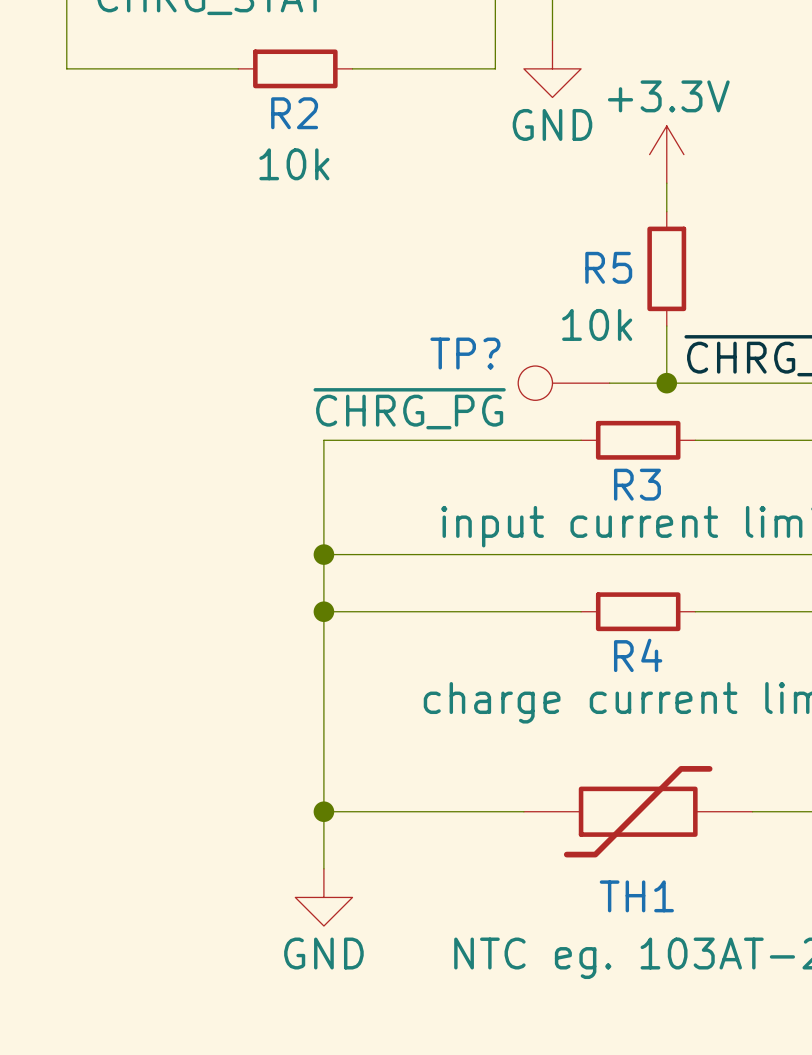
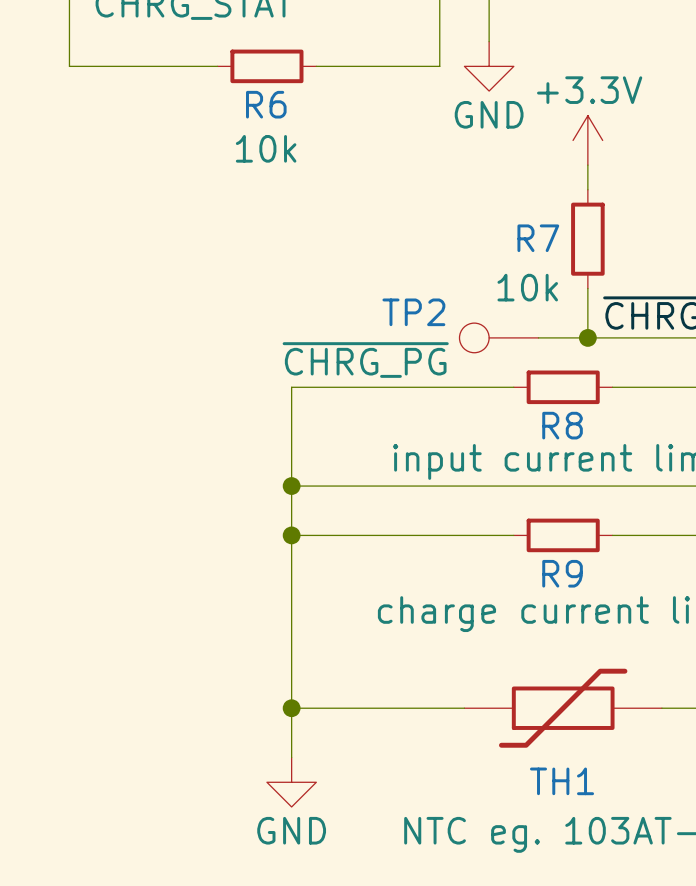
R2 name: R2 (294, 113) -> R6 (266, 104)
R5 name: R5 (608, 267) -> R7 (538, 238)
TP? name: TP? (465, 353) -> TP2 (413, 312)
R3 name: R3 (637, 484) -> R8 (562, 425)
R4 name: R4 (638, 655) -> R9 (562, 573)

